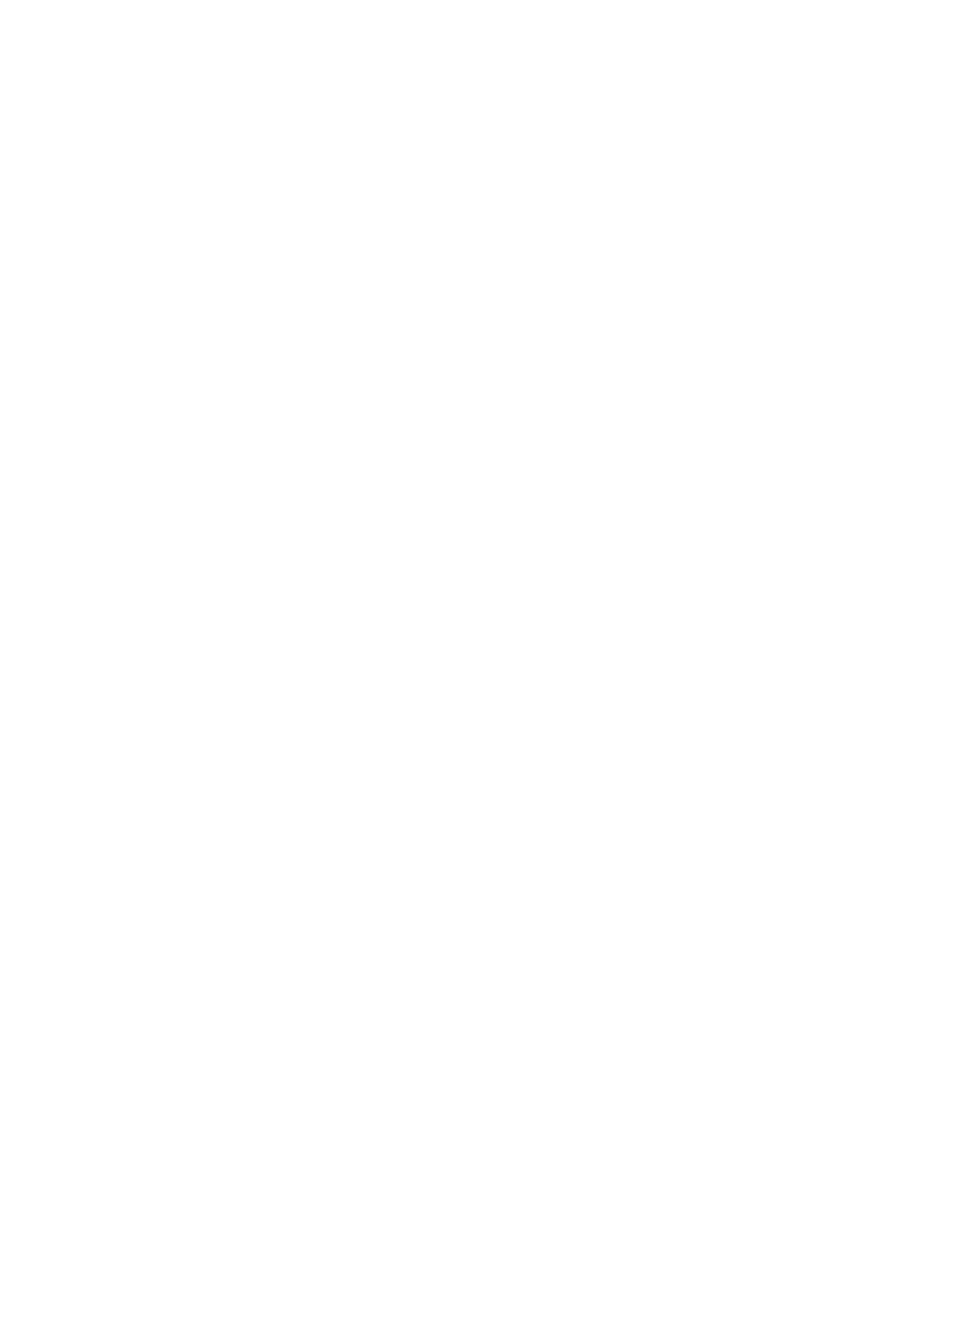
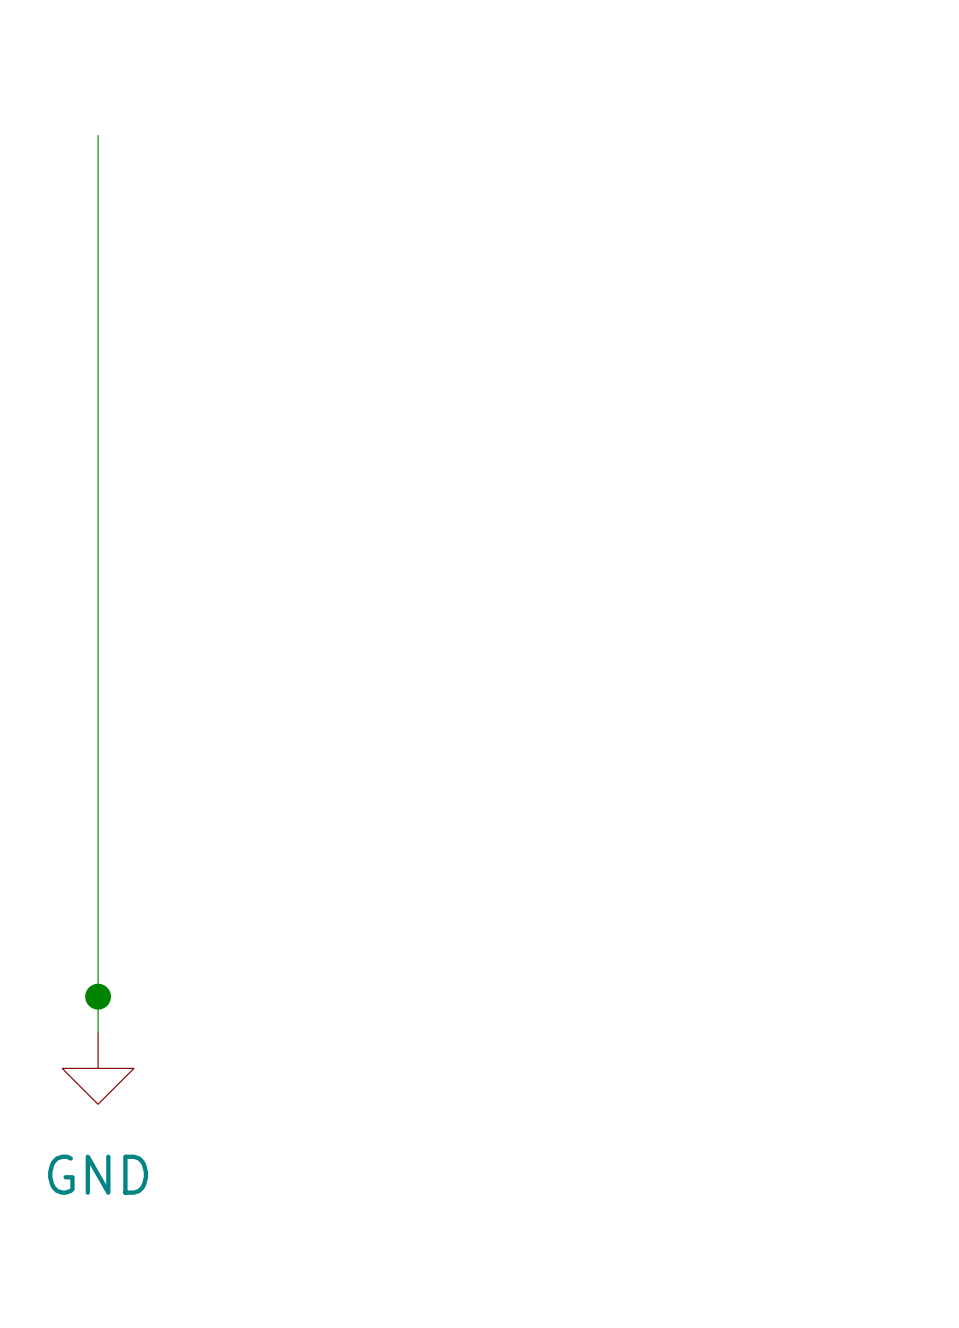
wire: none -> (98, 135) (98, 1032)
junction: none -> (98, 996)
power symbol: none -> GND (98, 1068)

